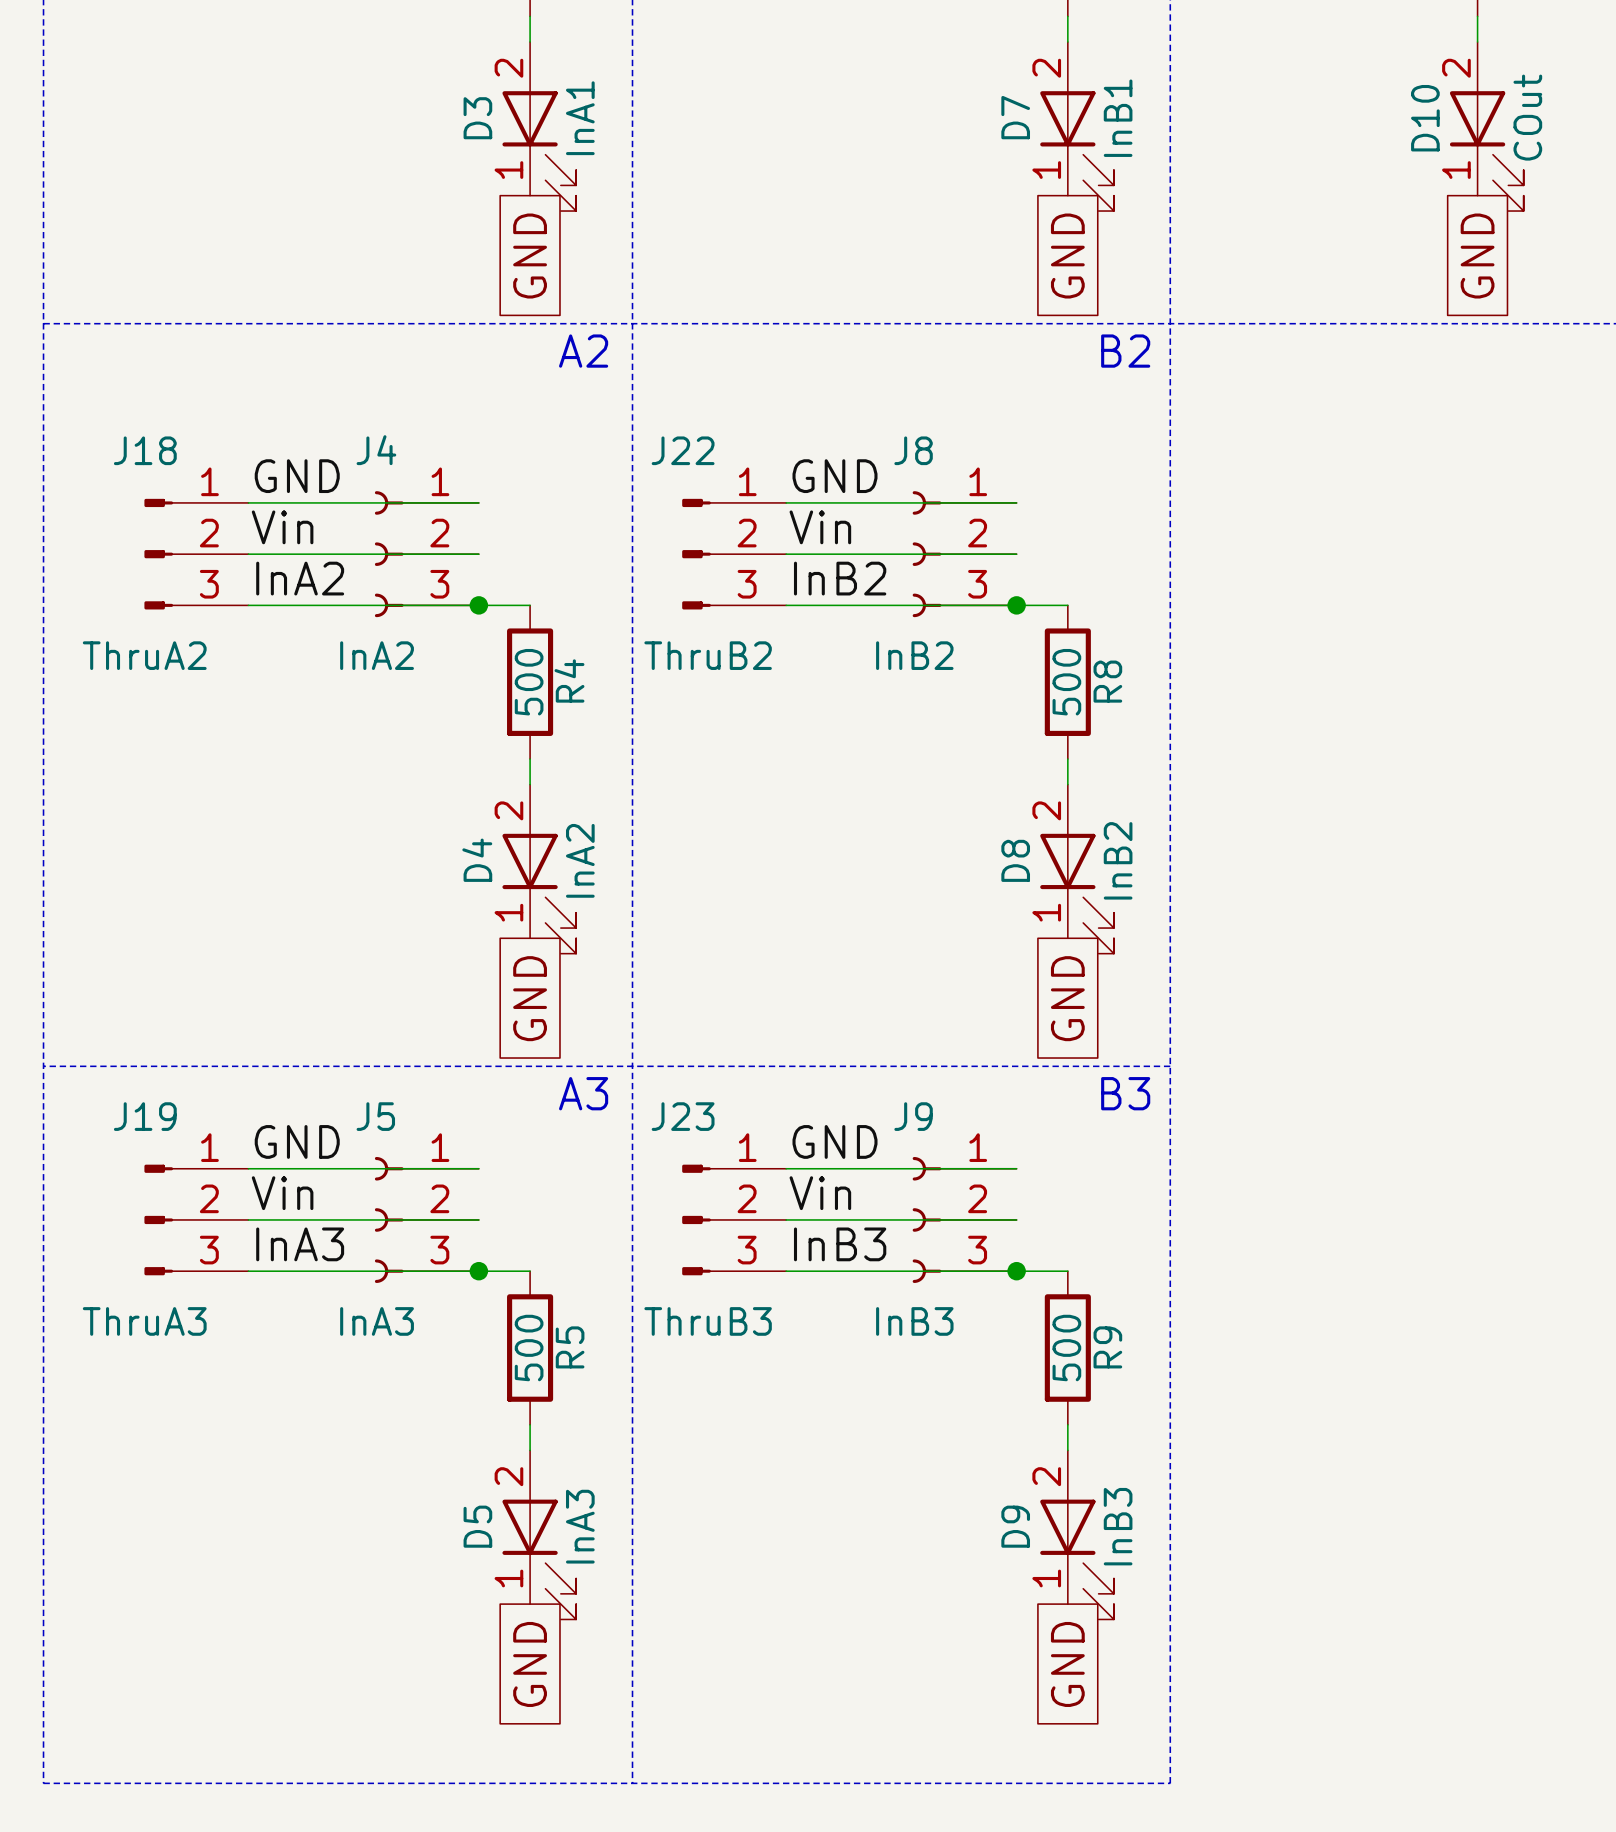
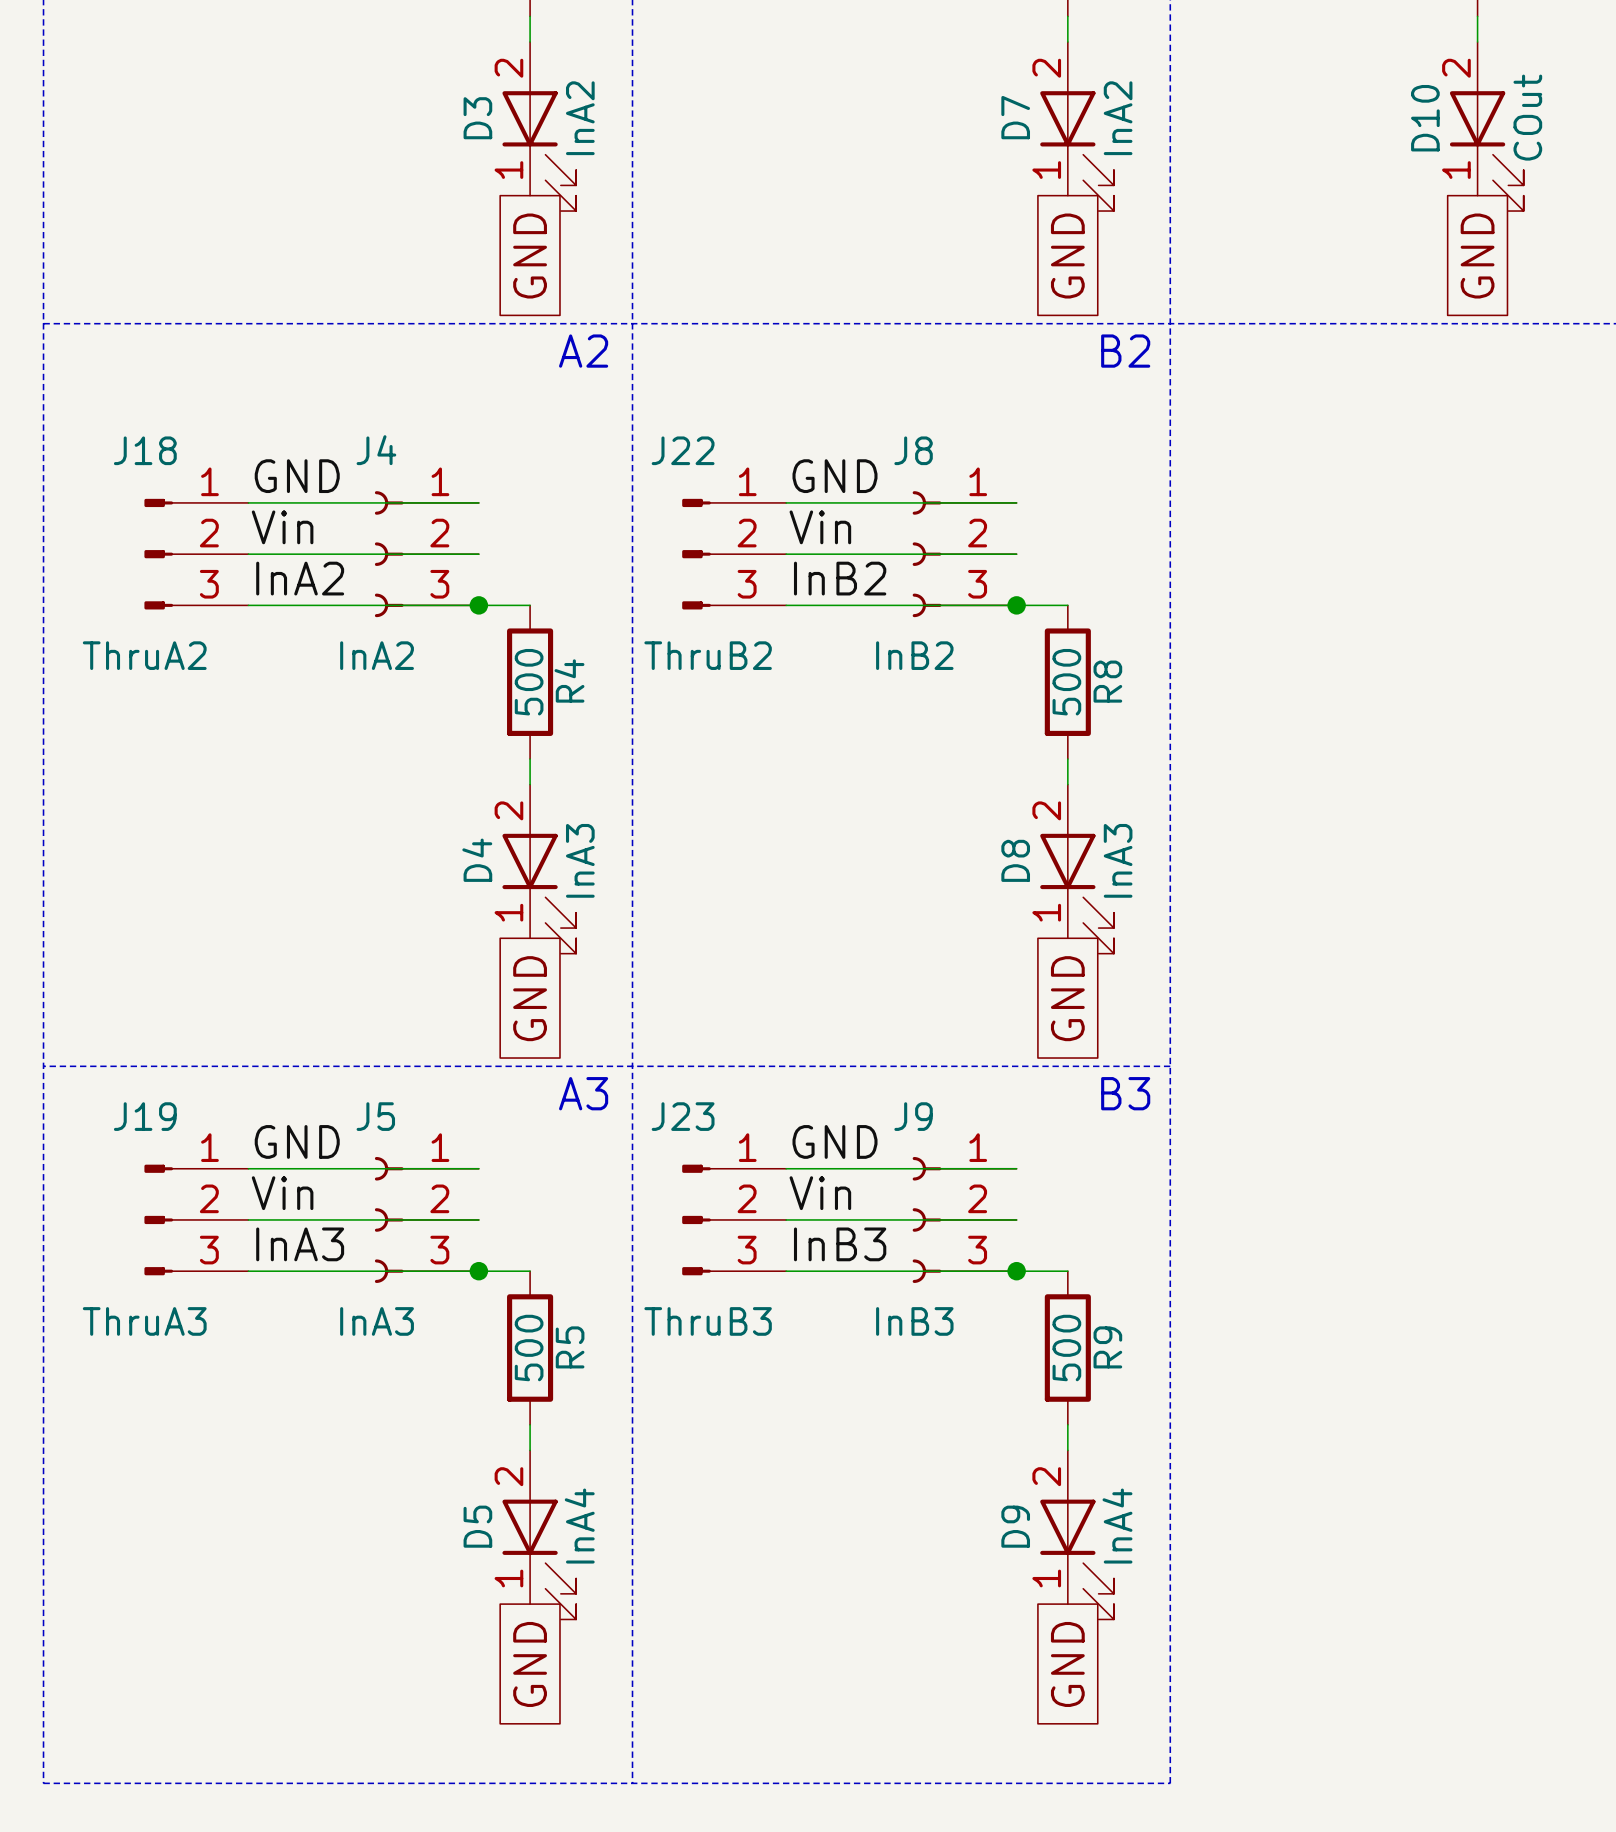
D3 value: InA1 (580, 118) -> InA2 (580, 118)
D7 value: InB1 (1118, 118) -> InA2 (1118, 118)
D4 value: InA2 (580, 860) -> InA3 (580, 860)
D8 value: InB2 (1118, 860) -> InA3 (1118, 860)
D5 value: InA3 (580, 1526) -> InA4 (579, 1526)
D9 value: InB3 (1118, 1526) -> InA4 (1117, 1526)

